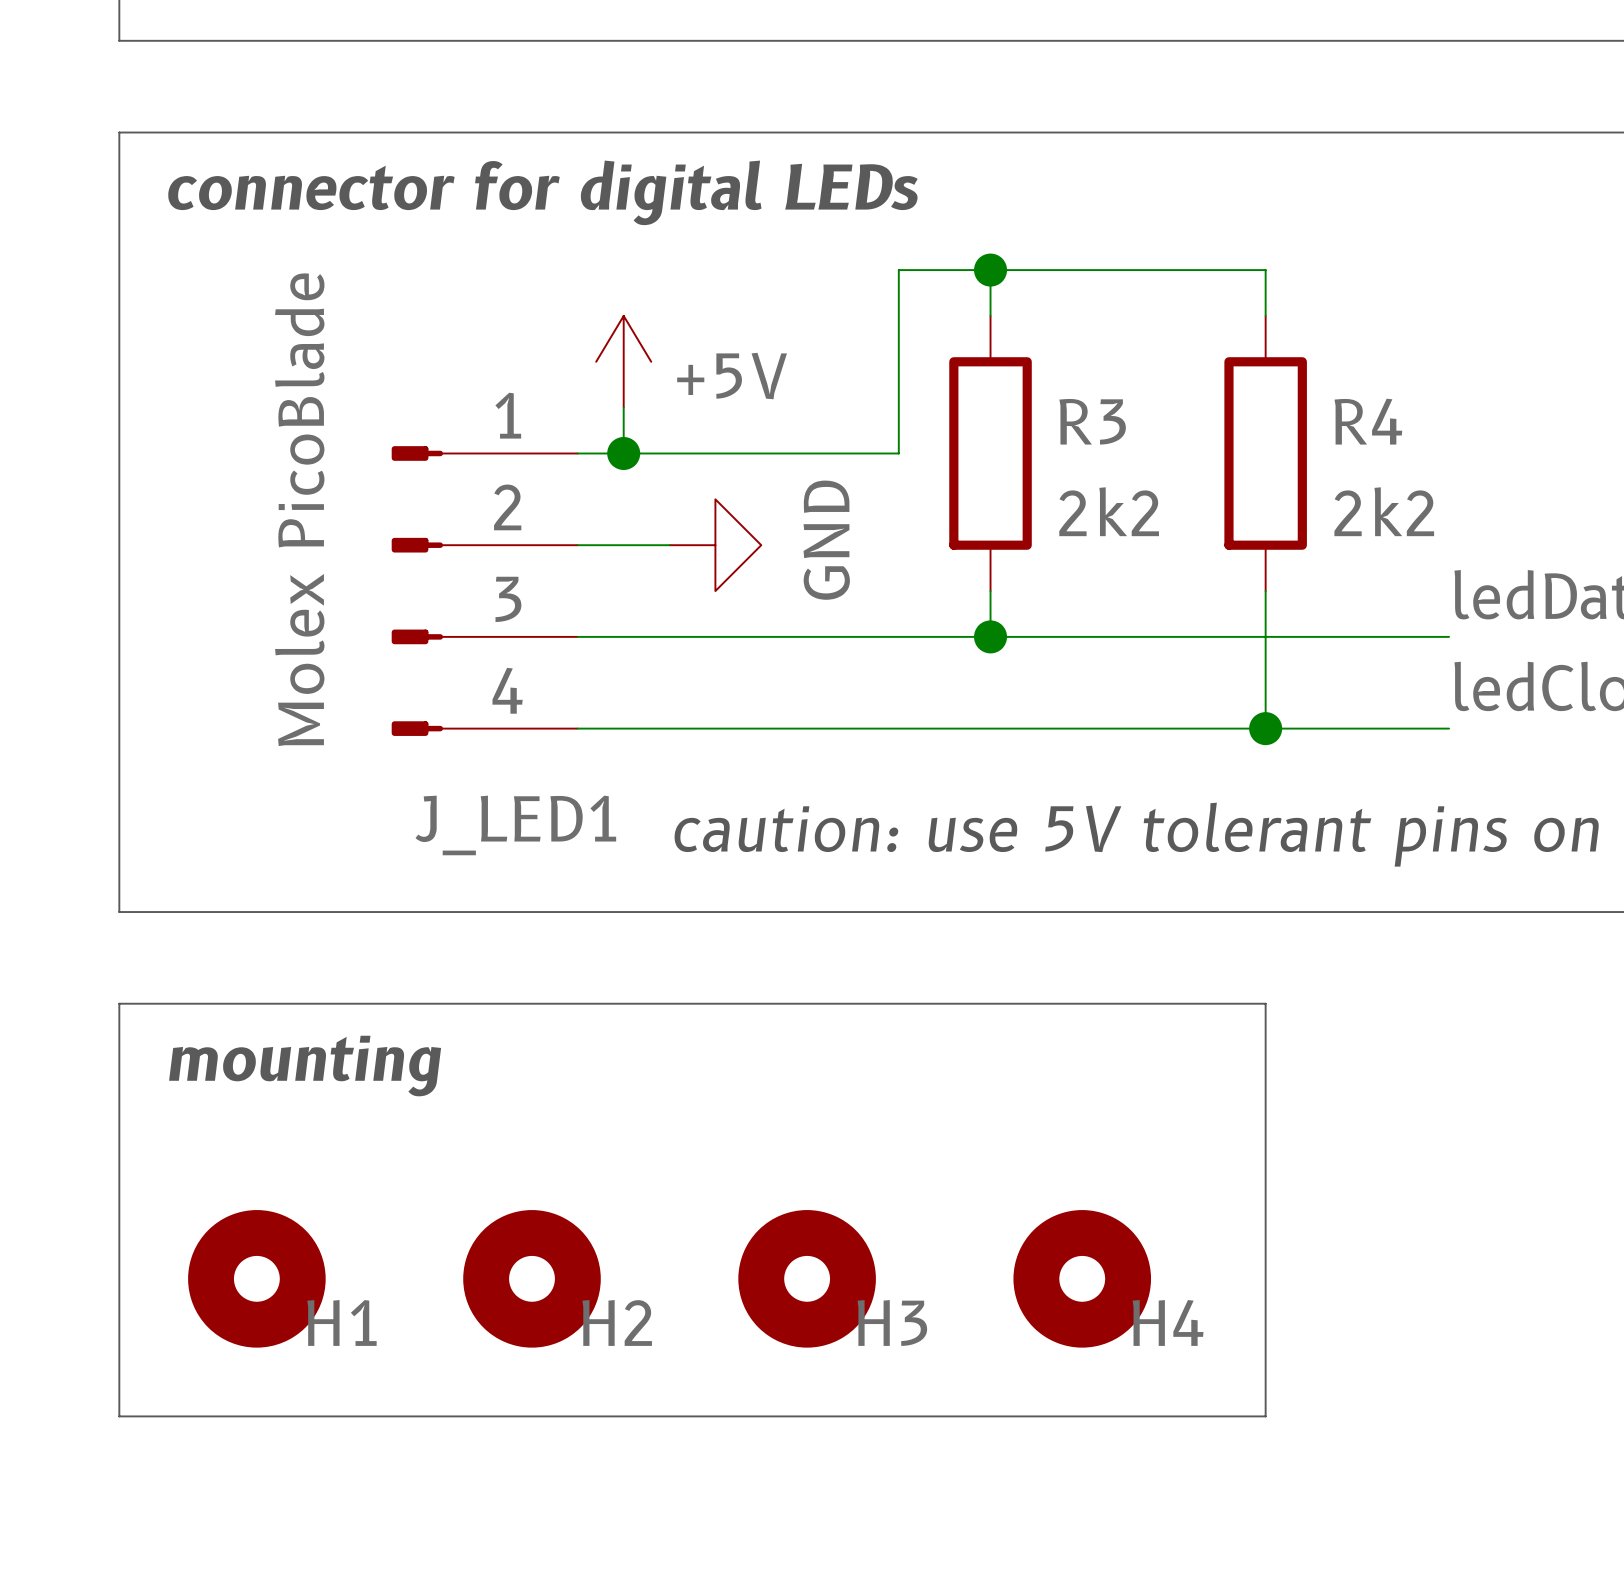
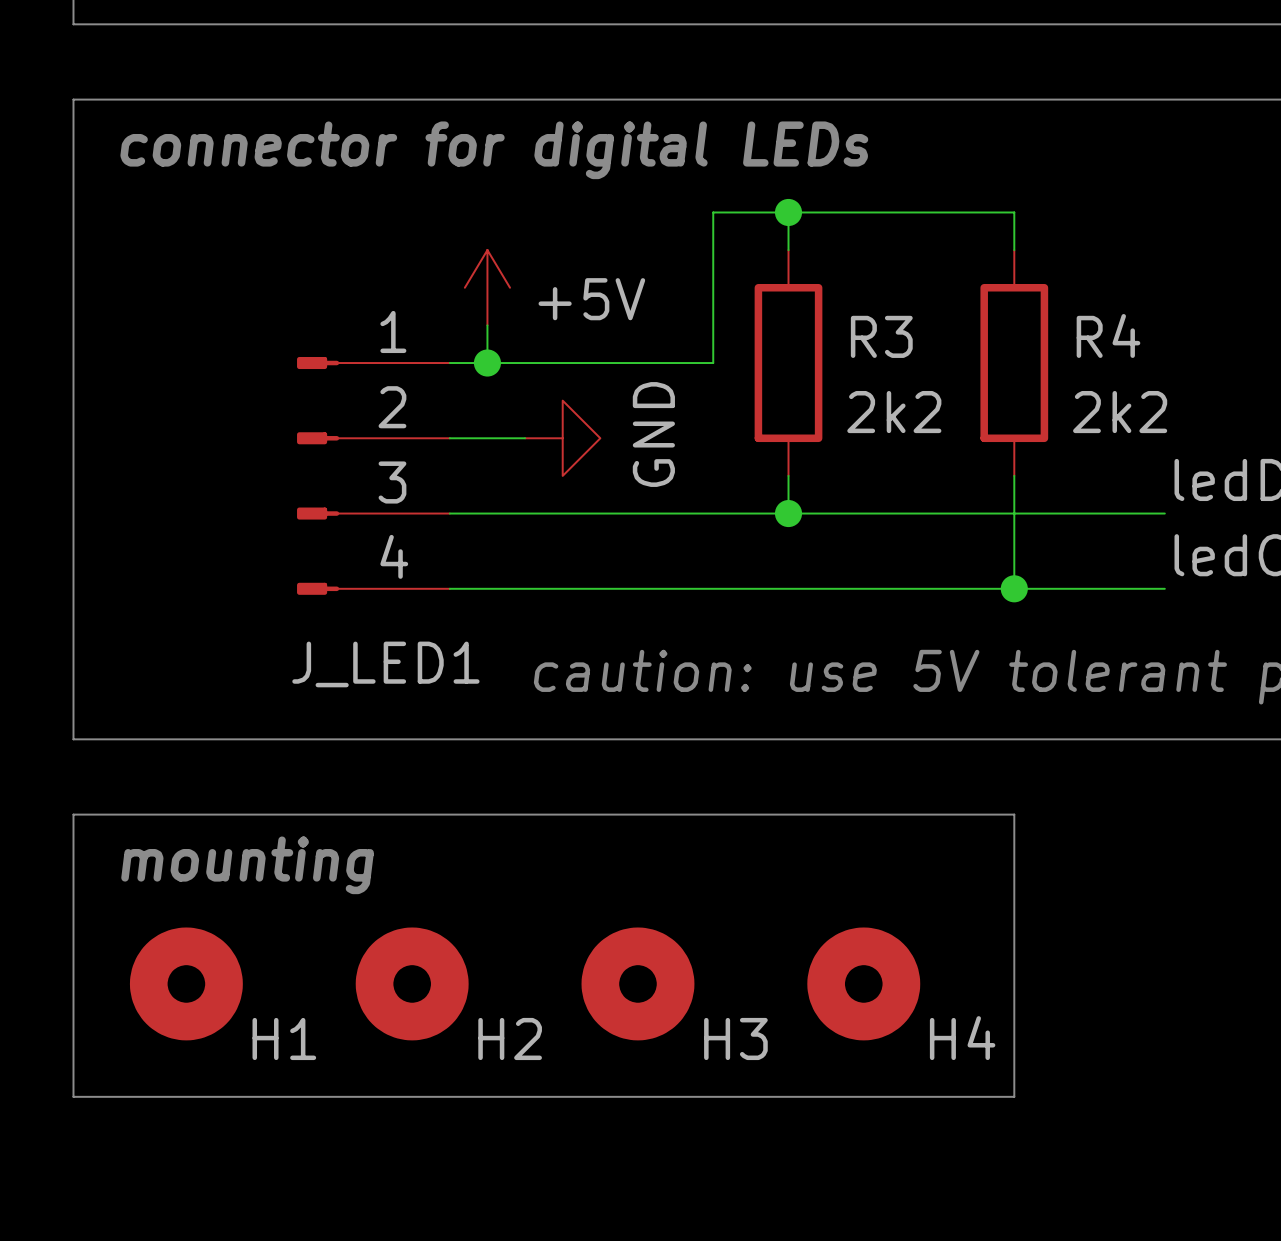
J_LED1 value: Molex PicoBlade (299, 509) -> none
H1 position: (256, 1278) -> (186, 983)
H2 position: (532, 1278) -> (412, 983)
H3 position: (807, 1278) -> (637, 983)
H4 position: (1082, 1278) -> (863, 983)
H1 name position: H1 (341, 1322) -> H1 (284, 1038)
H2 name position: H2 (617, 1322) -> H2 (510, 1038)
H3 name position: H3 (892, 1322) -> H3 (735, 1038)
H4 name position: H4 (1168, 1322) -> H4 (962, 1038)
line: (119, 1347) (119, 1416) (1265, 1416) (1265, 1347) -> (73, 1096) (1014, 1096)

